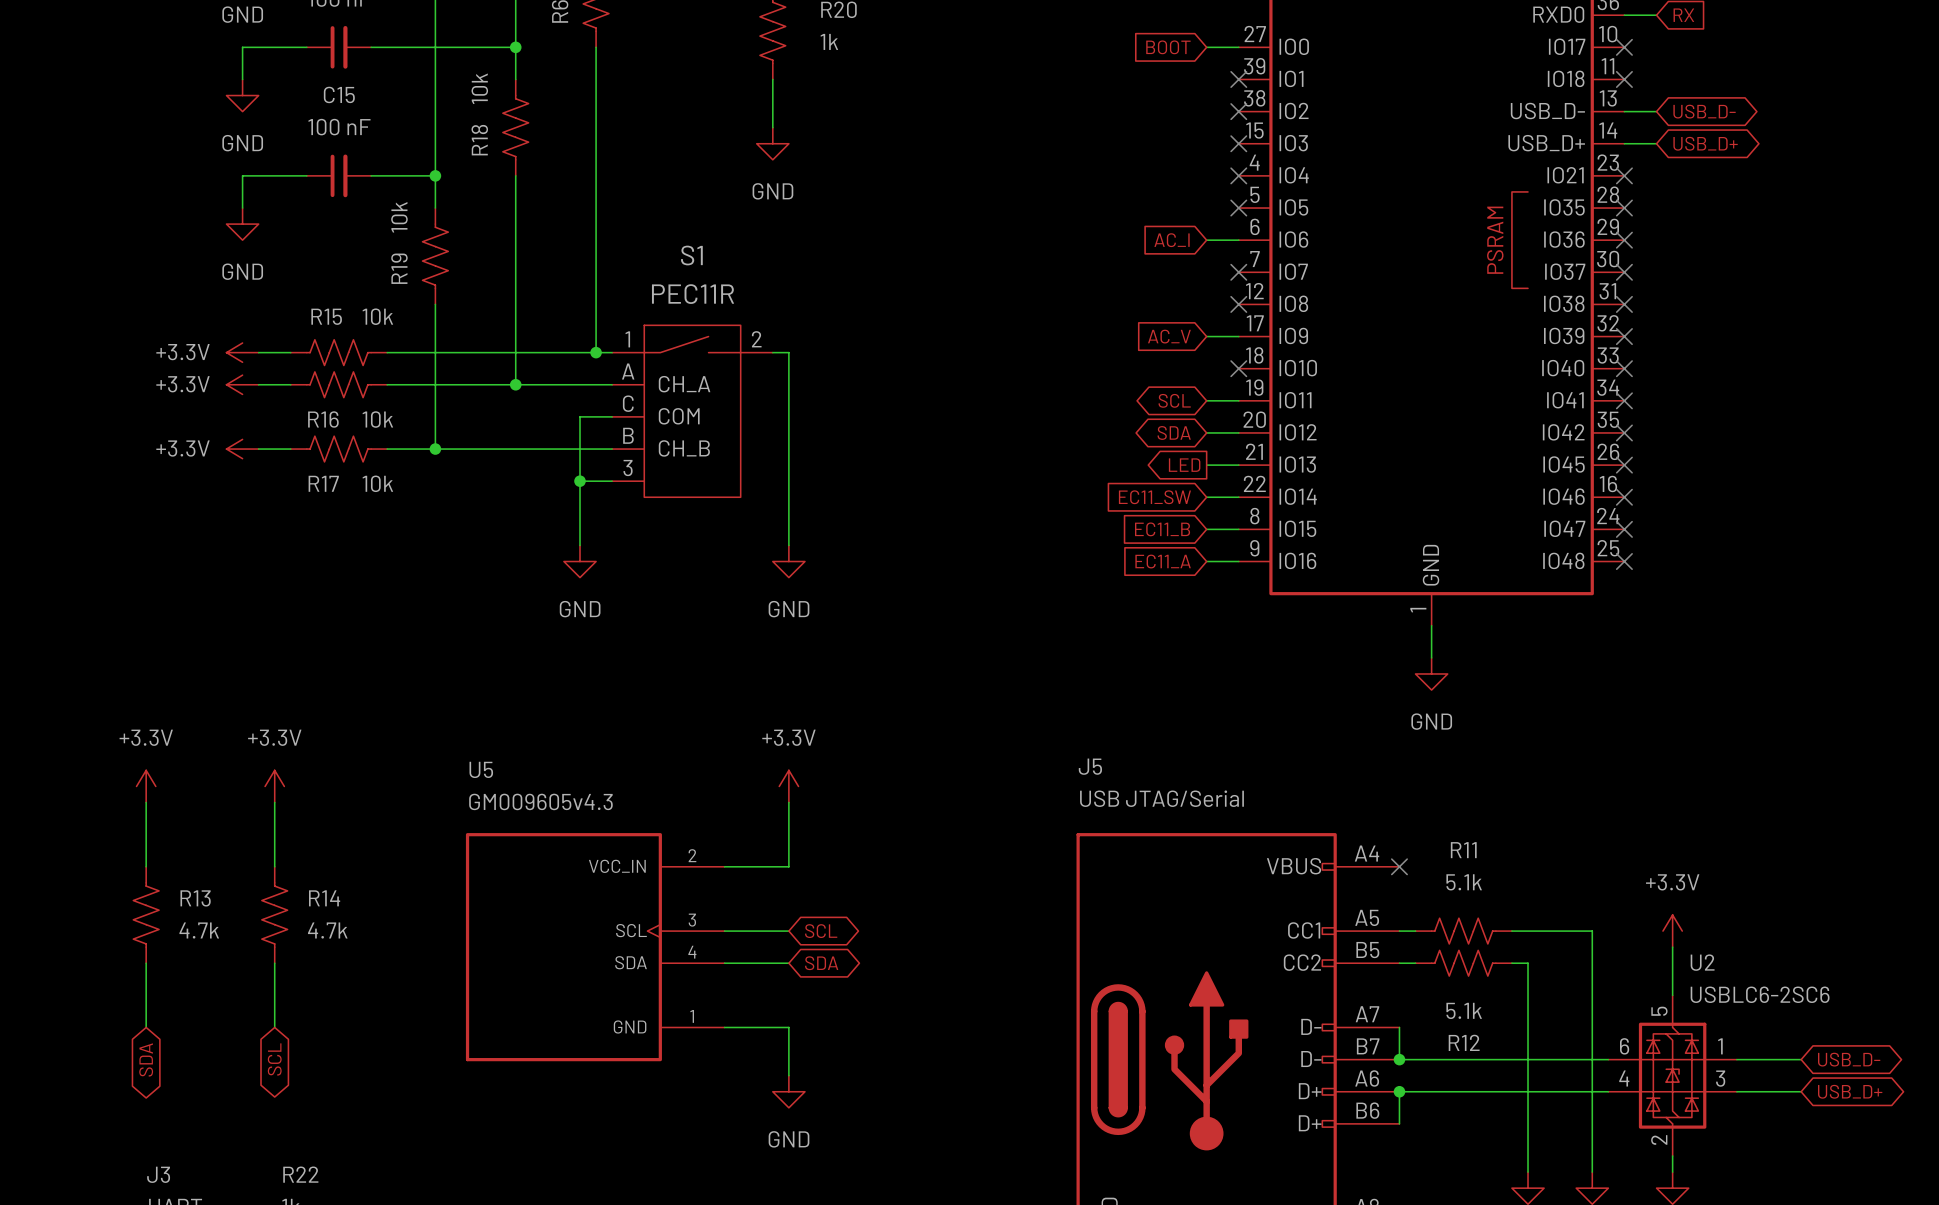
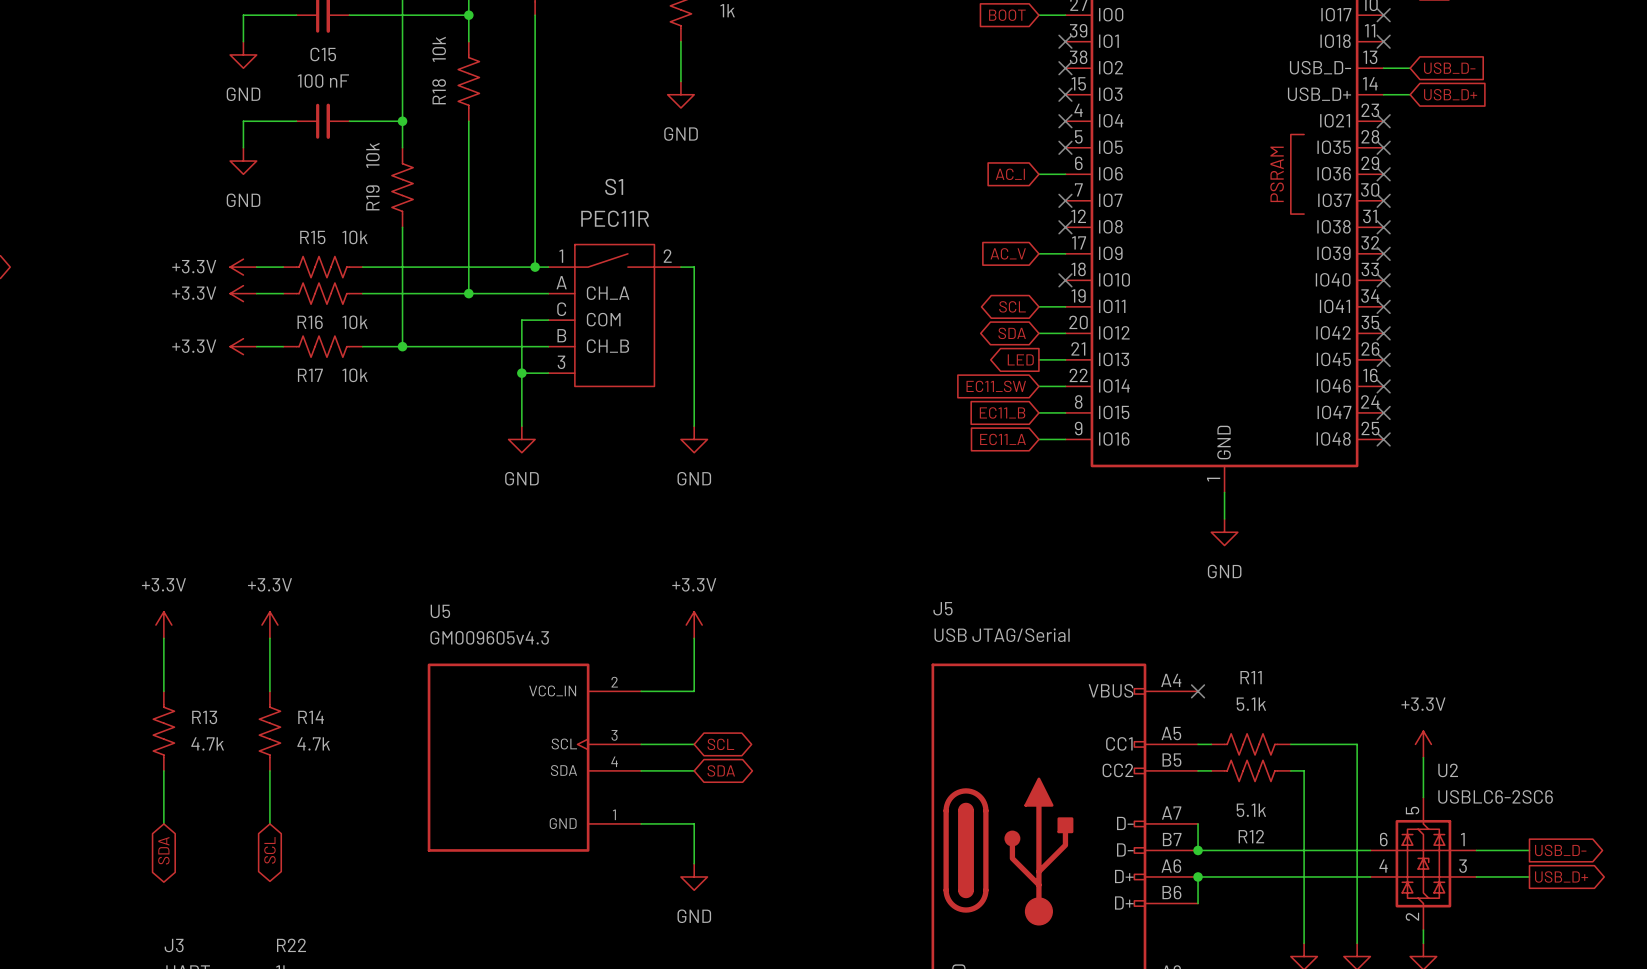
global label shape: bidirectional (1704, 111) -> input (1449, 68)
global label shape: bidirectional (1705, 143) -> input (1450, 94)
global label shape: bidirectional (1849, 1059) -> output (1560, 850)
global label shape: bidirectional (1850, 1091) -> output (1561, 876)

